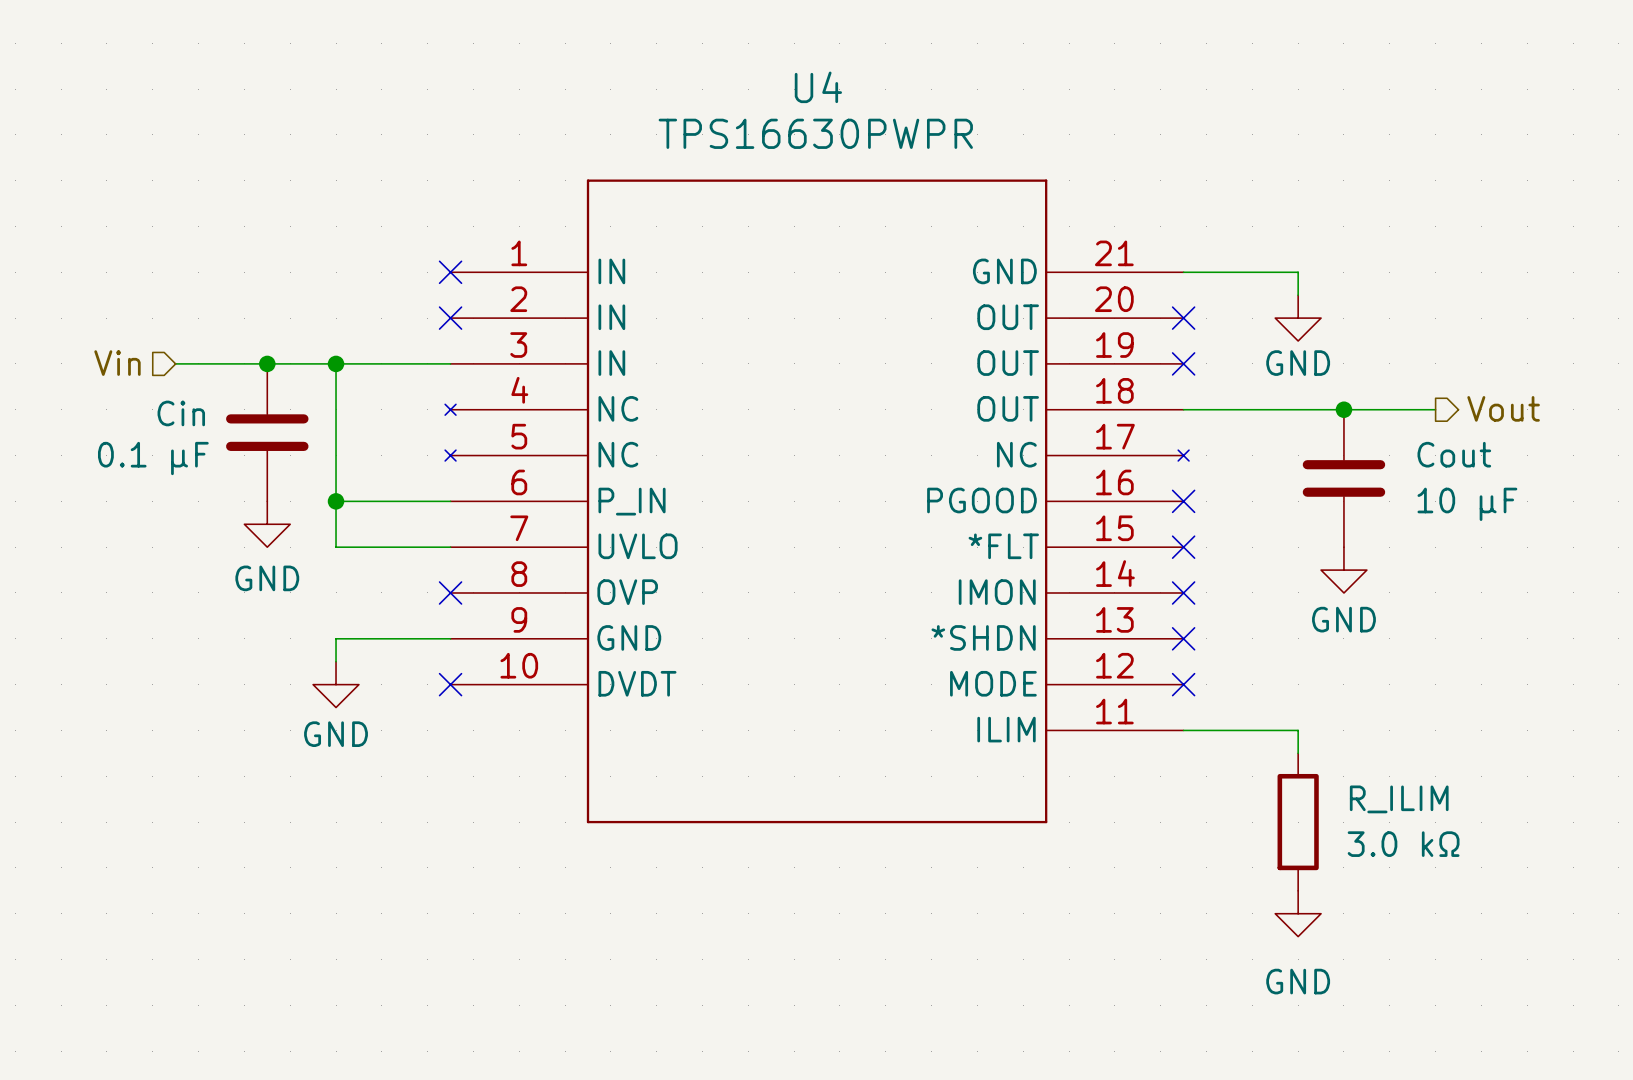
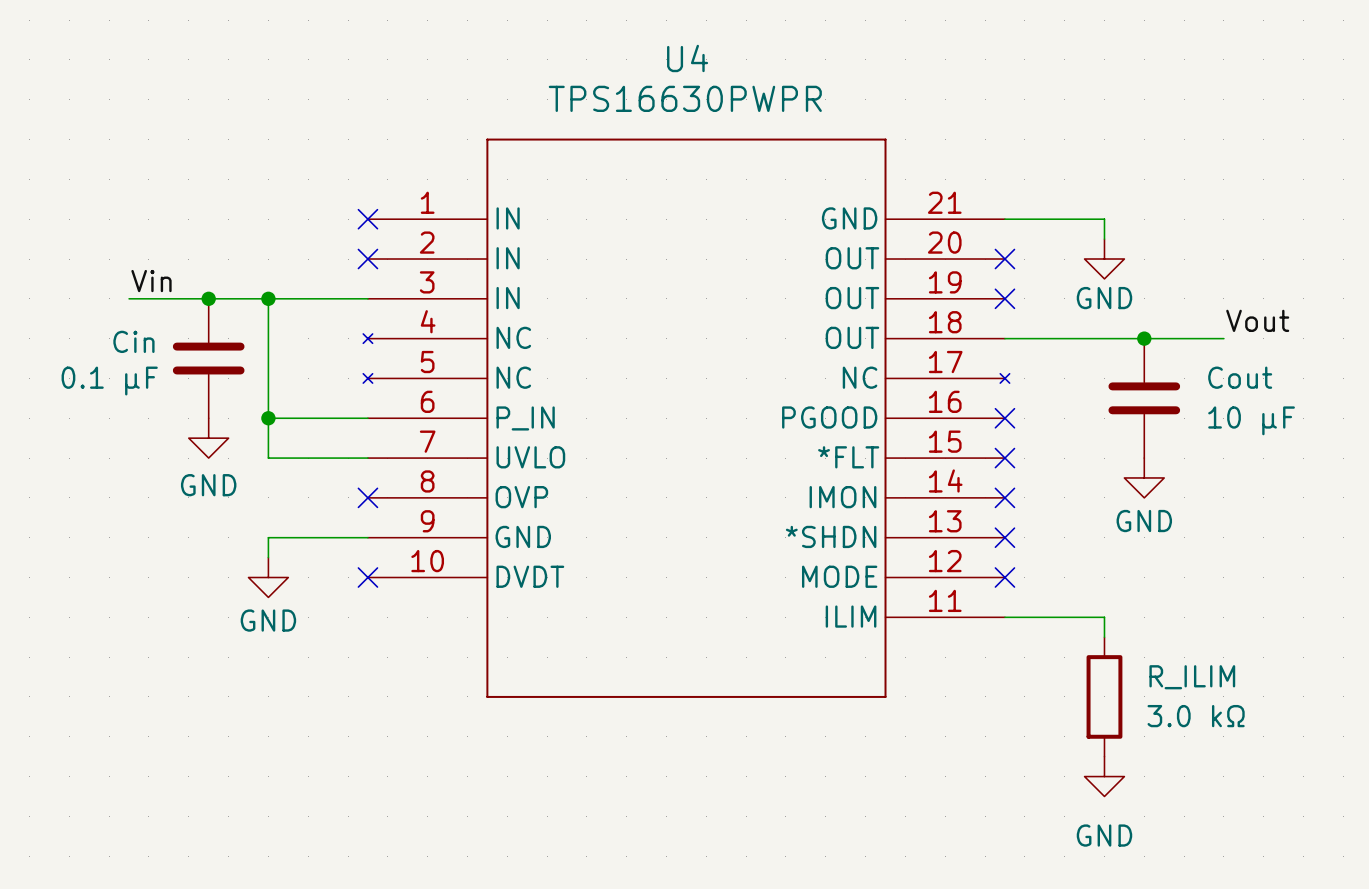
label: none -> Vin (151, 281)
hierarchical label: Vin (117, 363) -> none
label: none -> Vout (1257, 320)
hierarchical label: Vout (1503, 408) -> none

